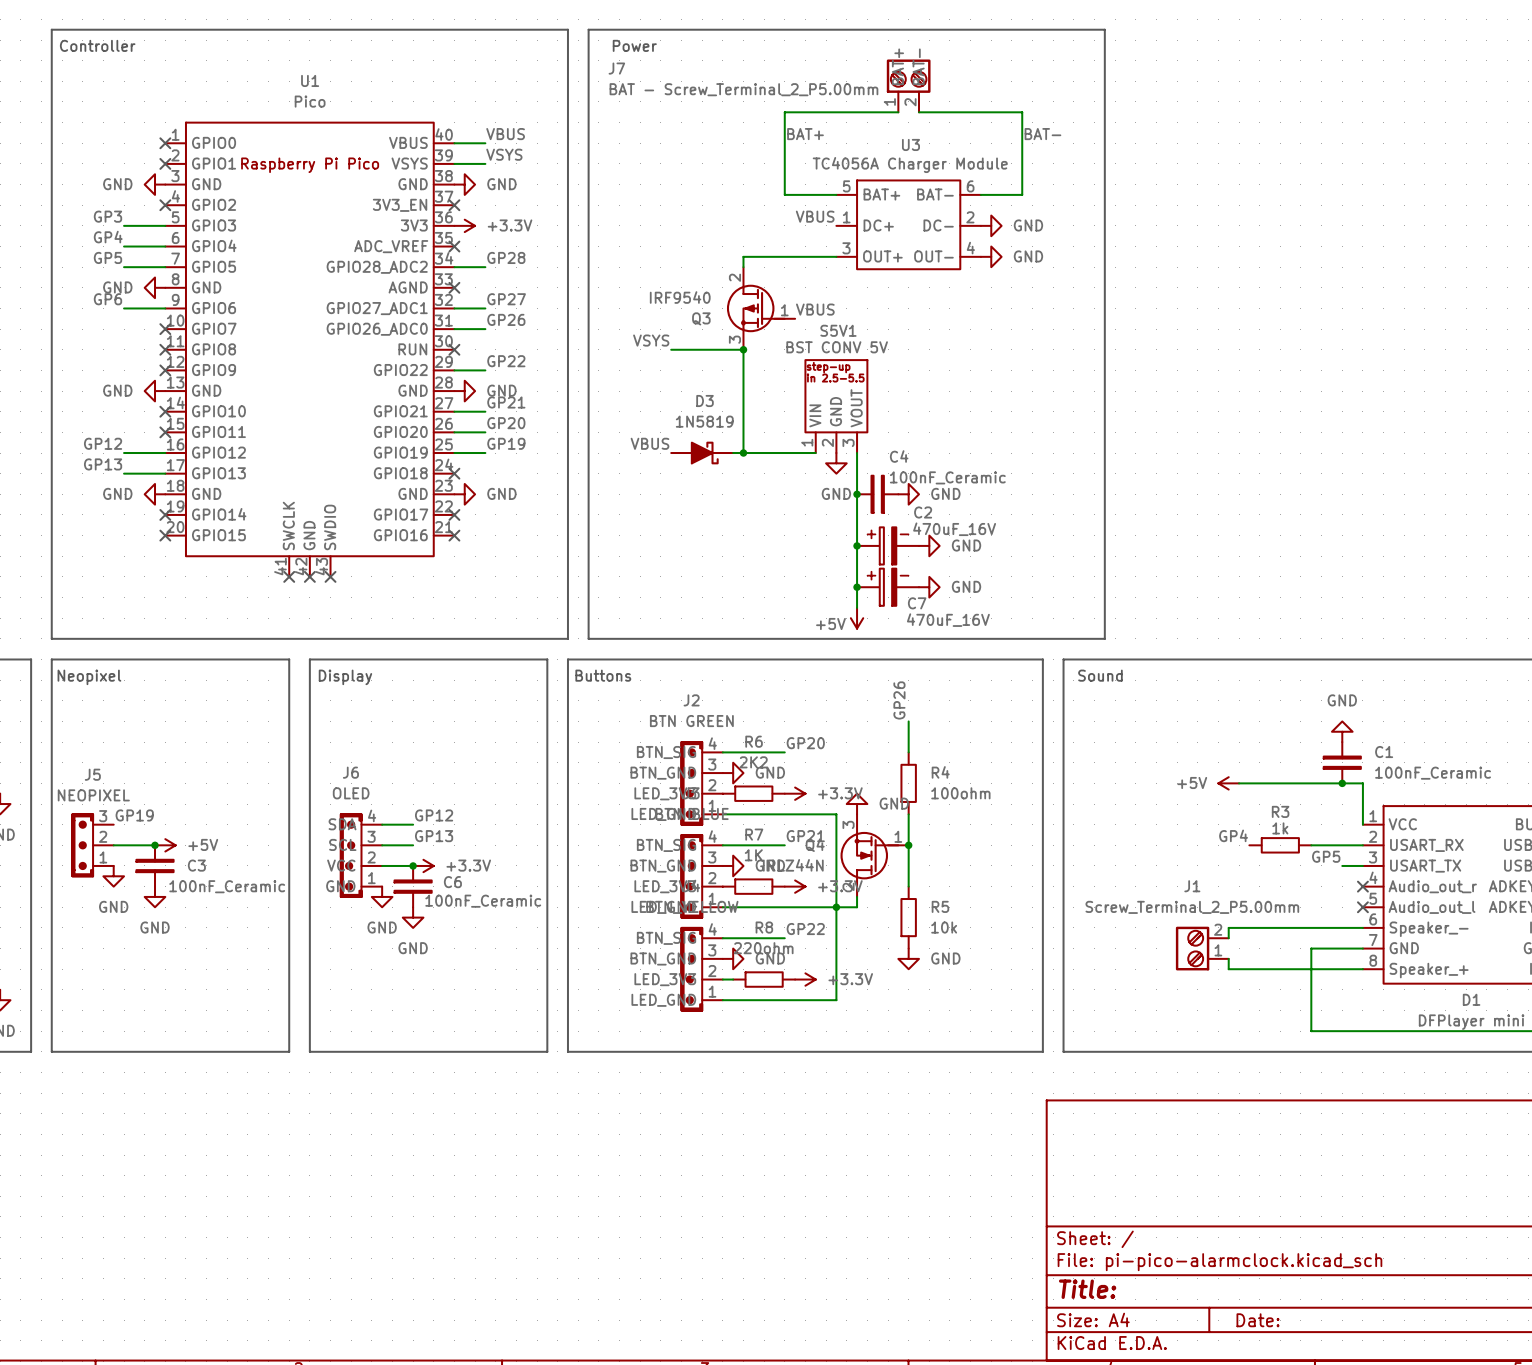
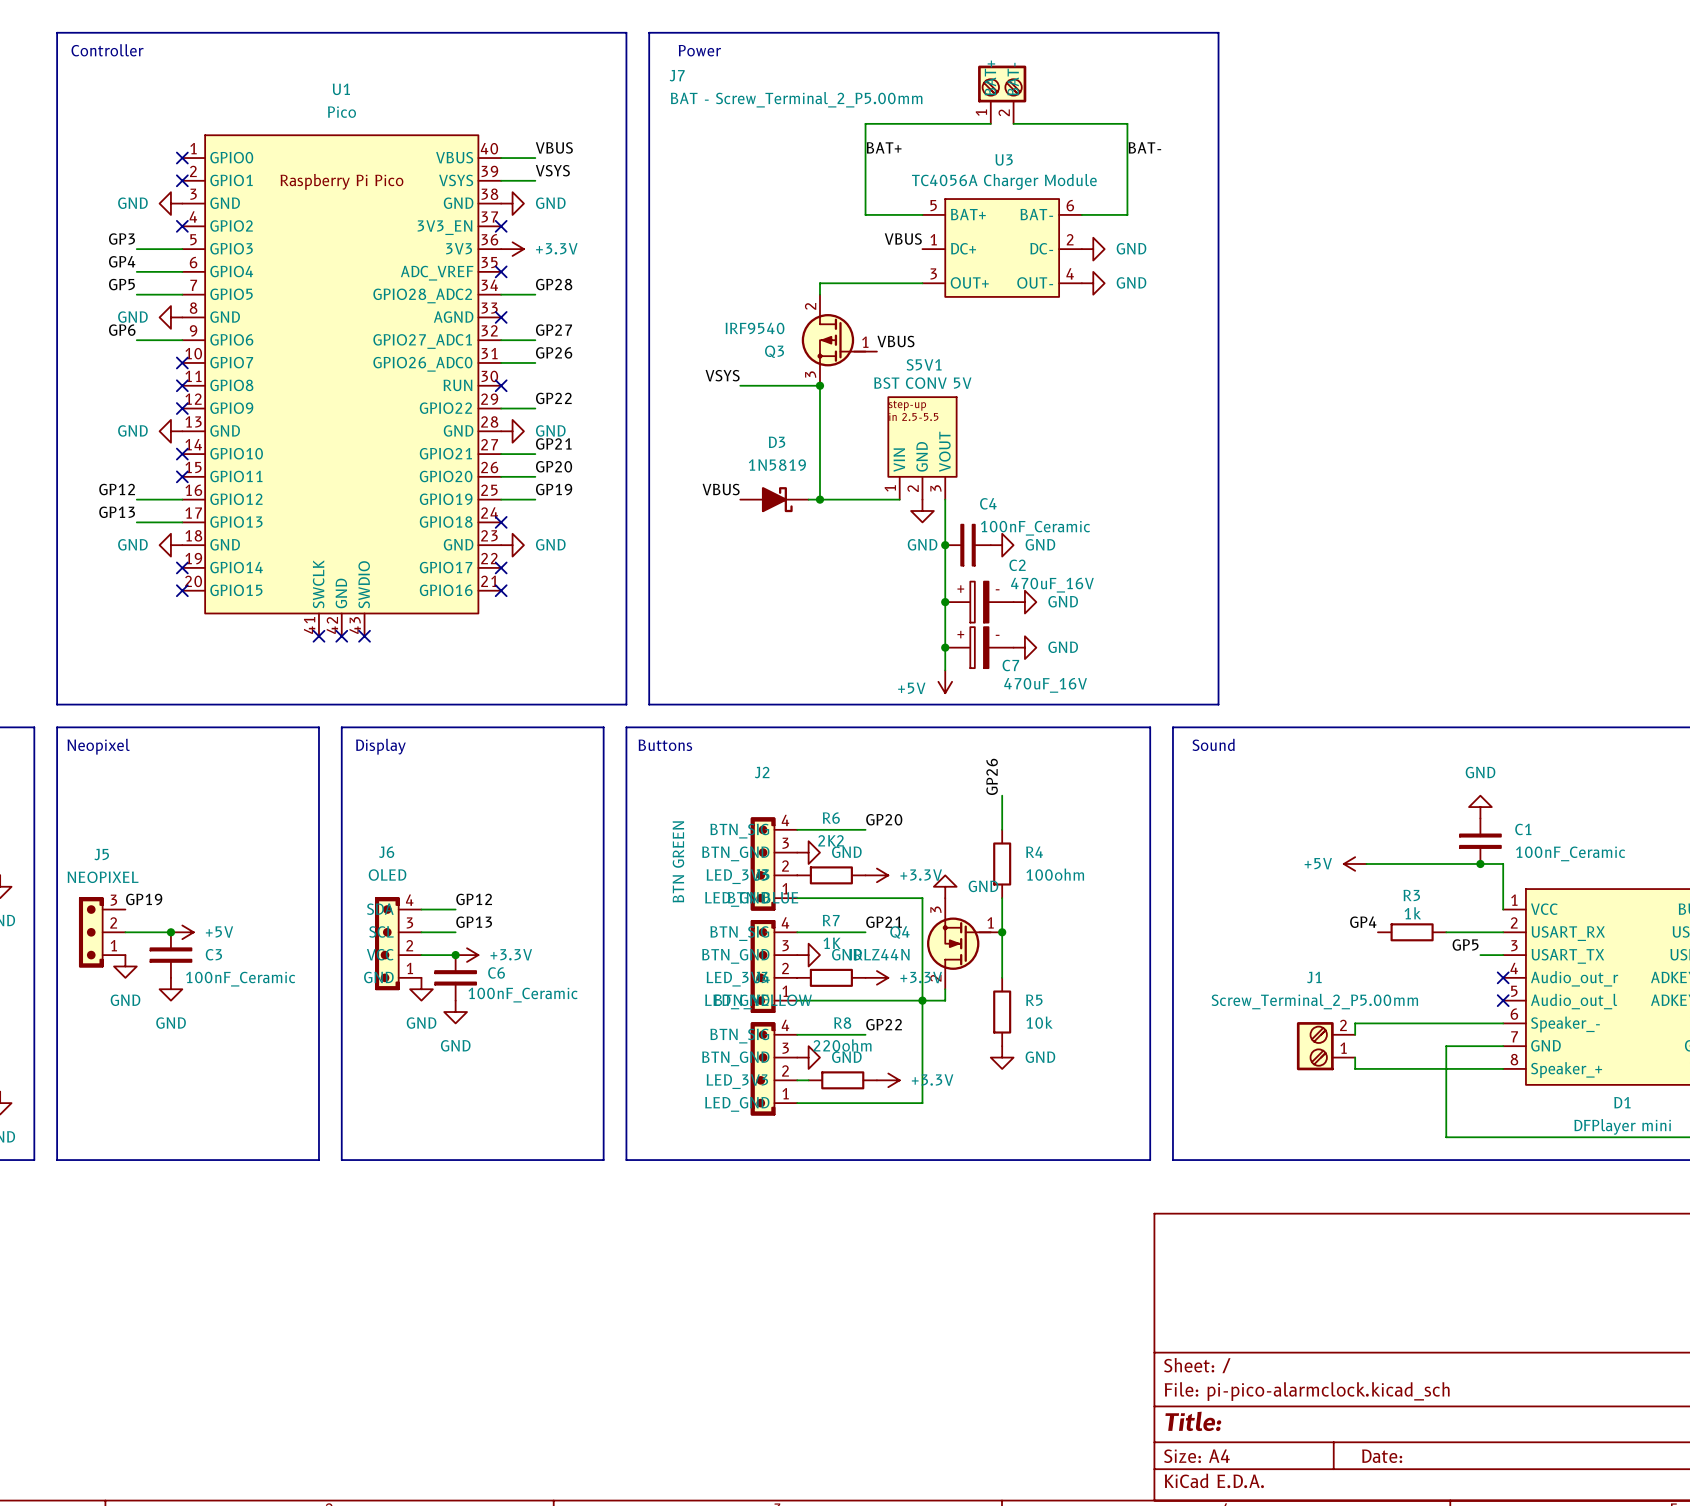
J2 value rotation: 0° (691, 721) -> 90° counterclockwise (678, 861)

